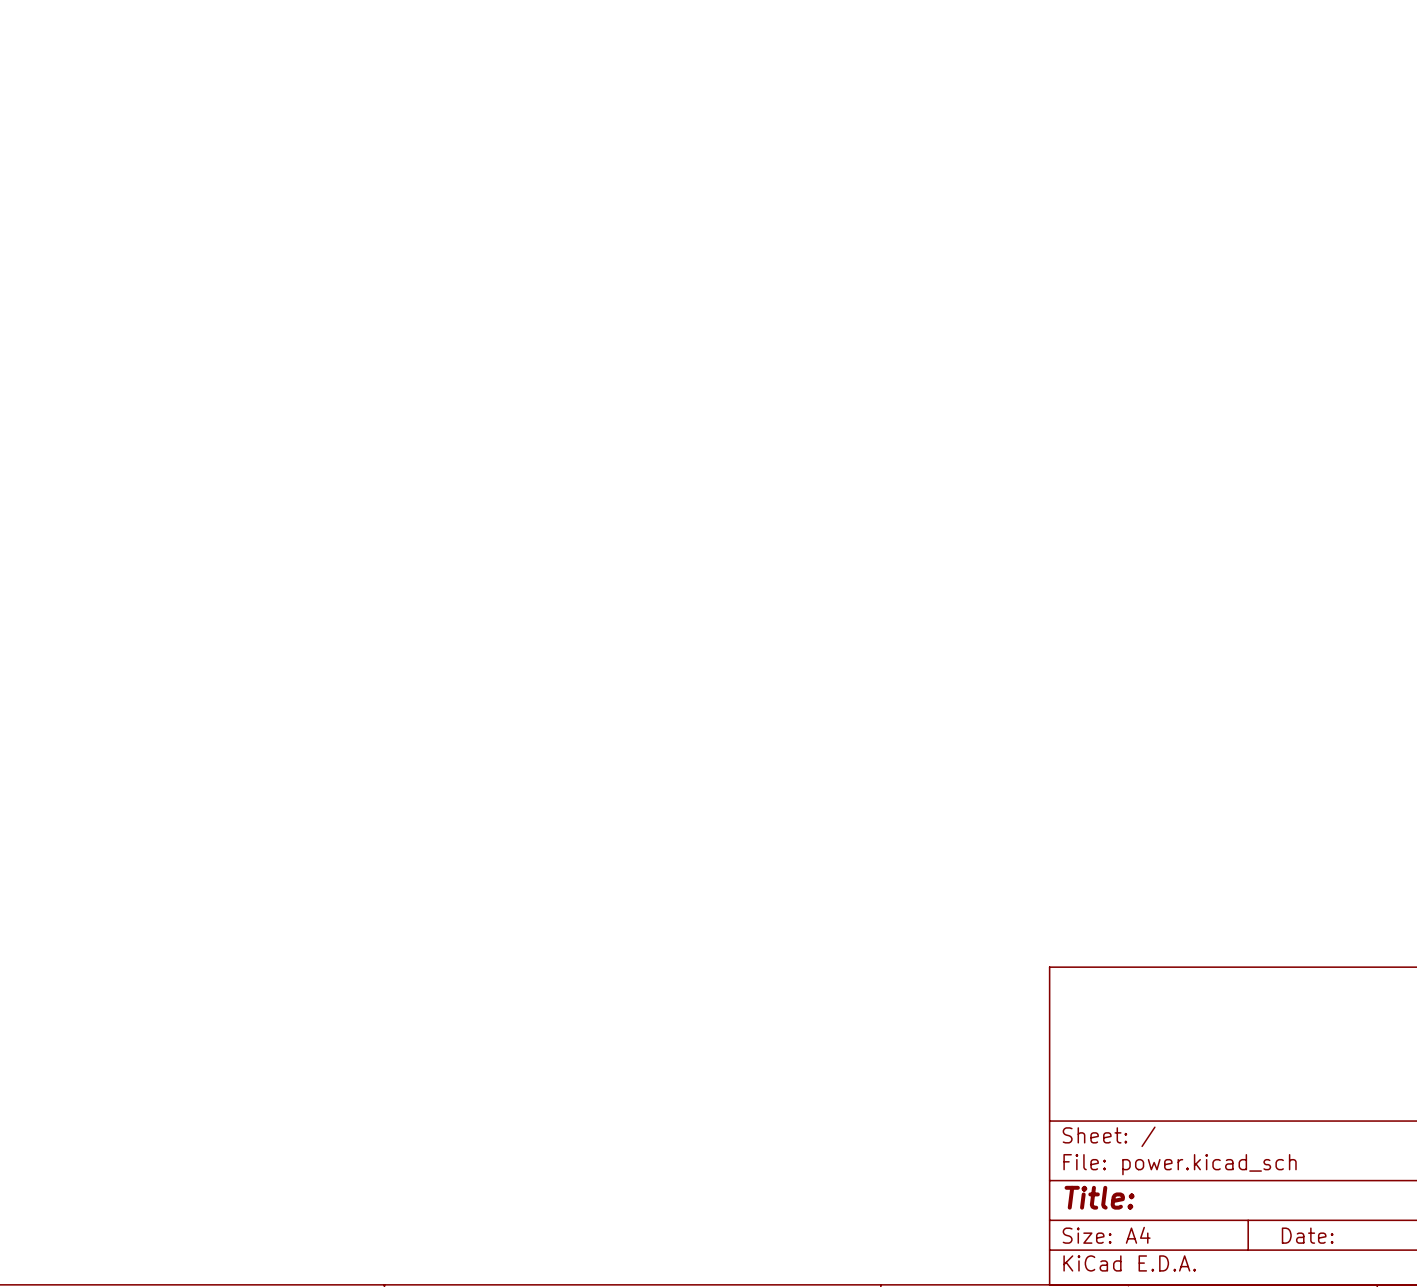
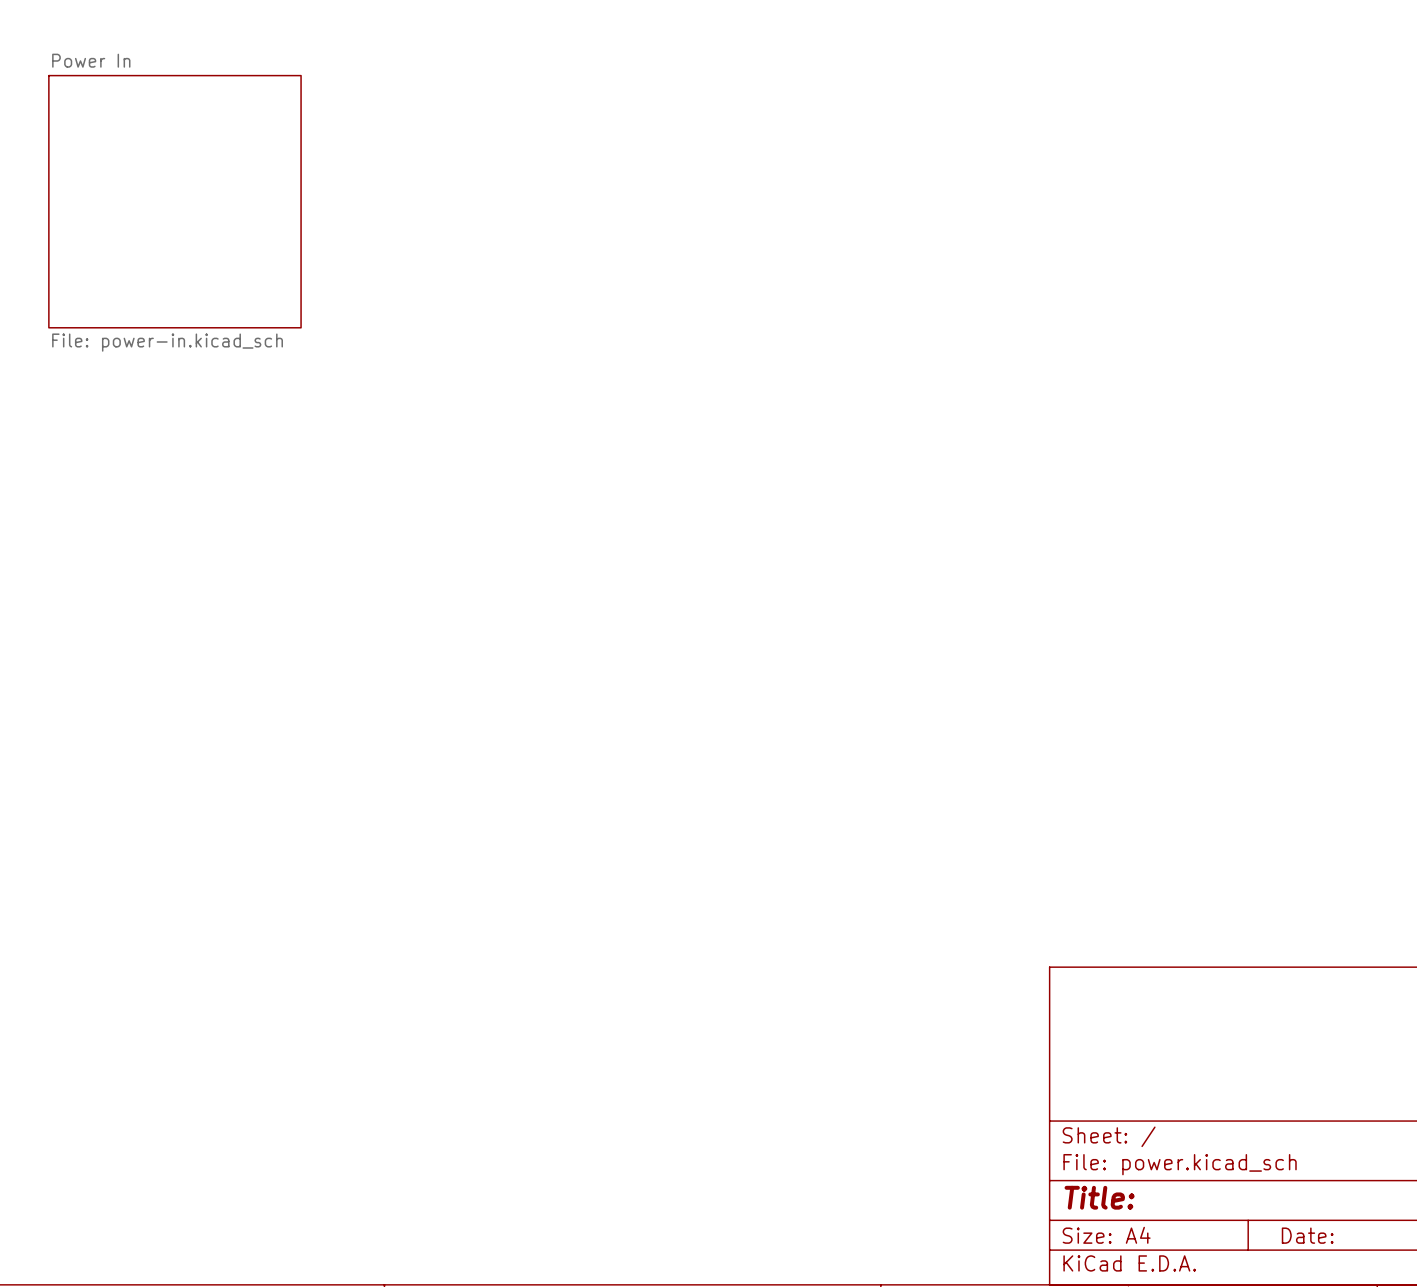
sheet Power In: none -> File: power-in.kicad_sch (174, 201)

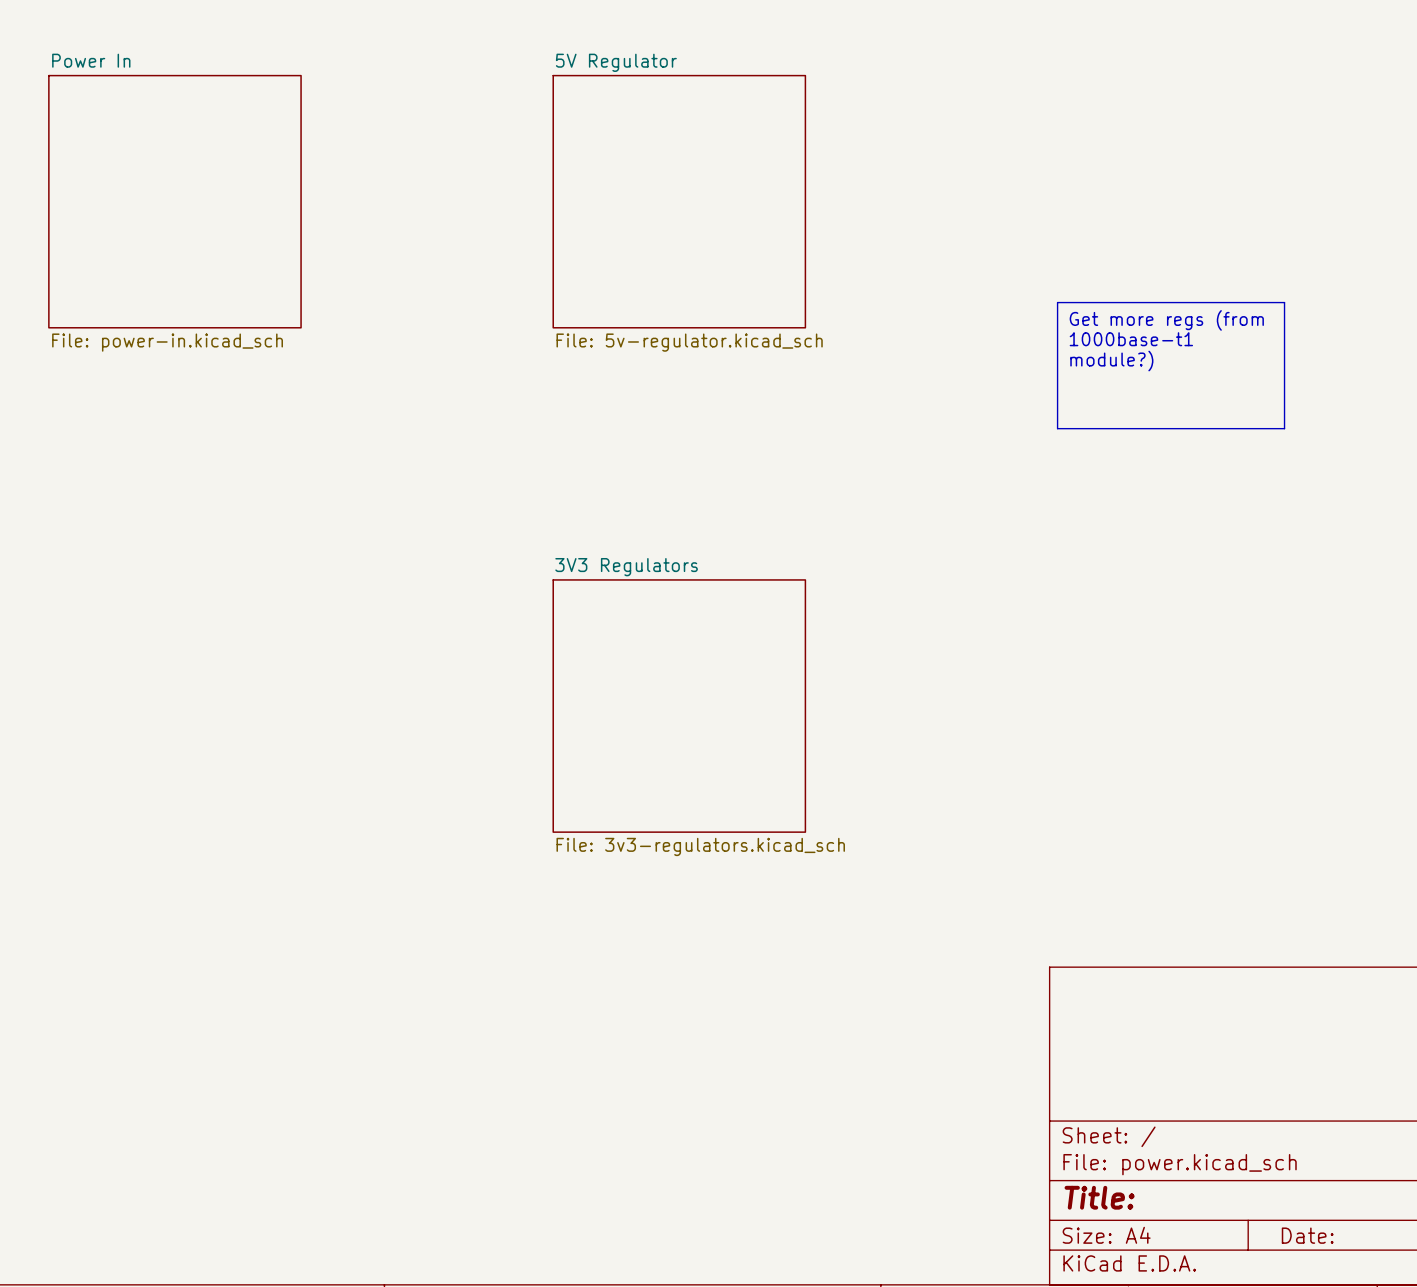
sheet 5V Regulator: none -> File: 5v-regulator.kicad_sch (679, 201)
line: none -> (1057, 302) (1284, 302) (1284, 428) (1057, 428) (1057, 302)
text: none -> Get more regs (from (1166, 320)
text: none -> 1000base-t1 (1131, 339)
text: none -> module?) (1111, 361)
sheet 3V3 Regulators: none -> File: 3v3-regulators.kicad_sch (679, 706)

